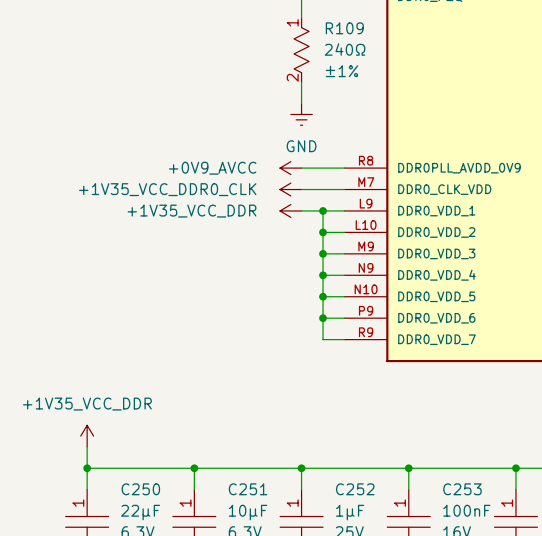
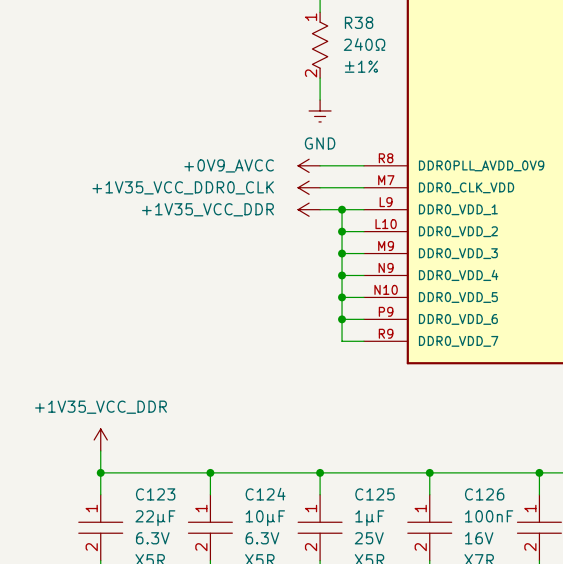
R109 name: R109 (344, 28) -> R38 (359, 22)
C250 name: C250 (140, 489) -> C123 (155, 494)
C251 name: C251 (248, 489) -> C124 (265, 494)
C252 name: C252 (355, 489) -> C125 (375, 494)
C253 name: C253 (462, 489) -> C126 (484, 494)

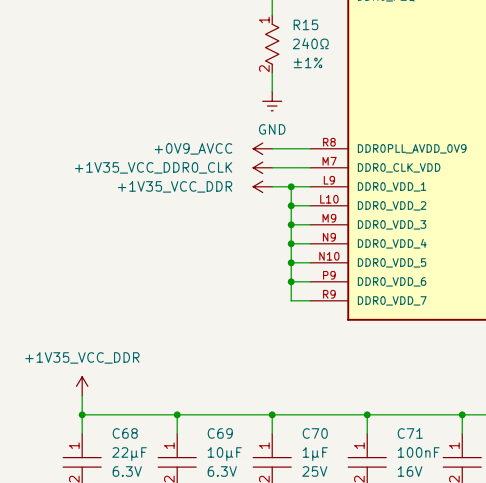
R38 name: R38 (359, 22) -> R15 (305, 24)
C123 name: C123 (155, 494) -> C68 (125, 433)
C124 name: C124 (265, 494) -> C69 (220, 433)
C125 name: C125 (375, 494) -> C70 (315, 433)
C126 name: C126 (484, 494) -> C71 (410, 433)

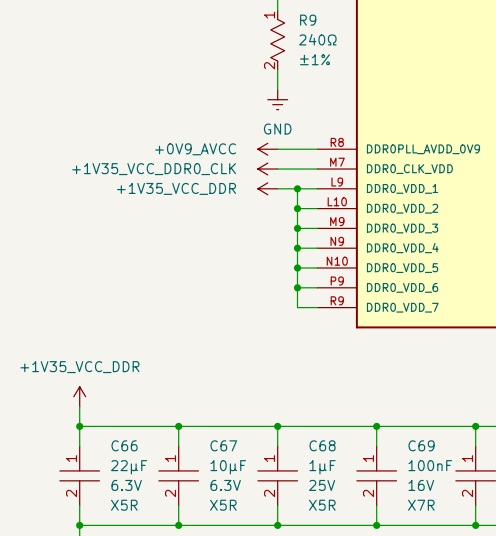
R15 name: R15 (305, 24) -> R9 (308, 20)
C68 name: C68 (125, 433) -> C66 (124, 445)
C69 name: C69 (220, 433) -> C67 (223, 445)
C70 name: C70 (315, 433) -> C68 (322, 445)
C71 name: C71 (410, 433) -> C69 (421, 445)

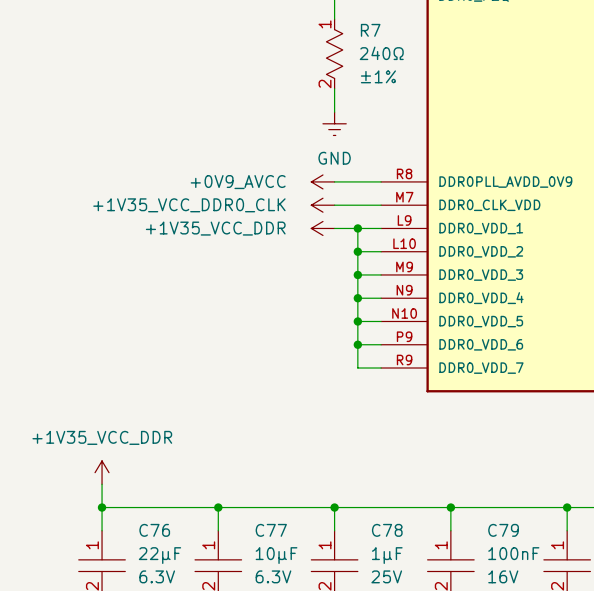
R9 name: R9 (308, 20) -> R7 (370, 30)
C66 name: C66 (124, 445) -> C76 (154, 530)
C67 name: C67 (223, 445) -> C77 (271, 530)
C68 name: C68 (322, 445) -> C78 (387, 530)
C69 name: C69 (421, 445) -> C79 (503, 530)

